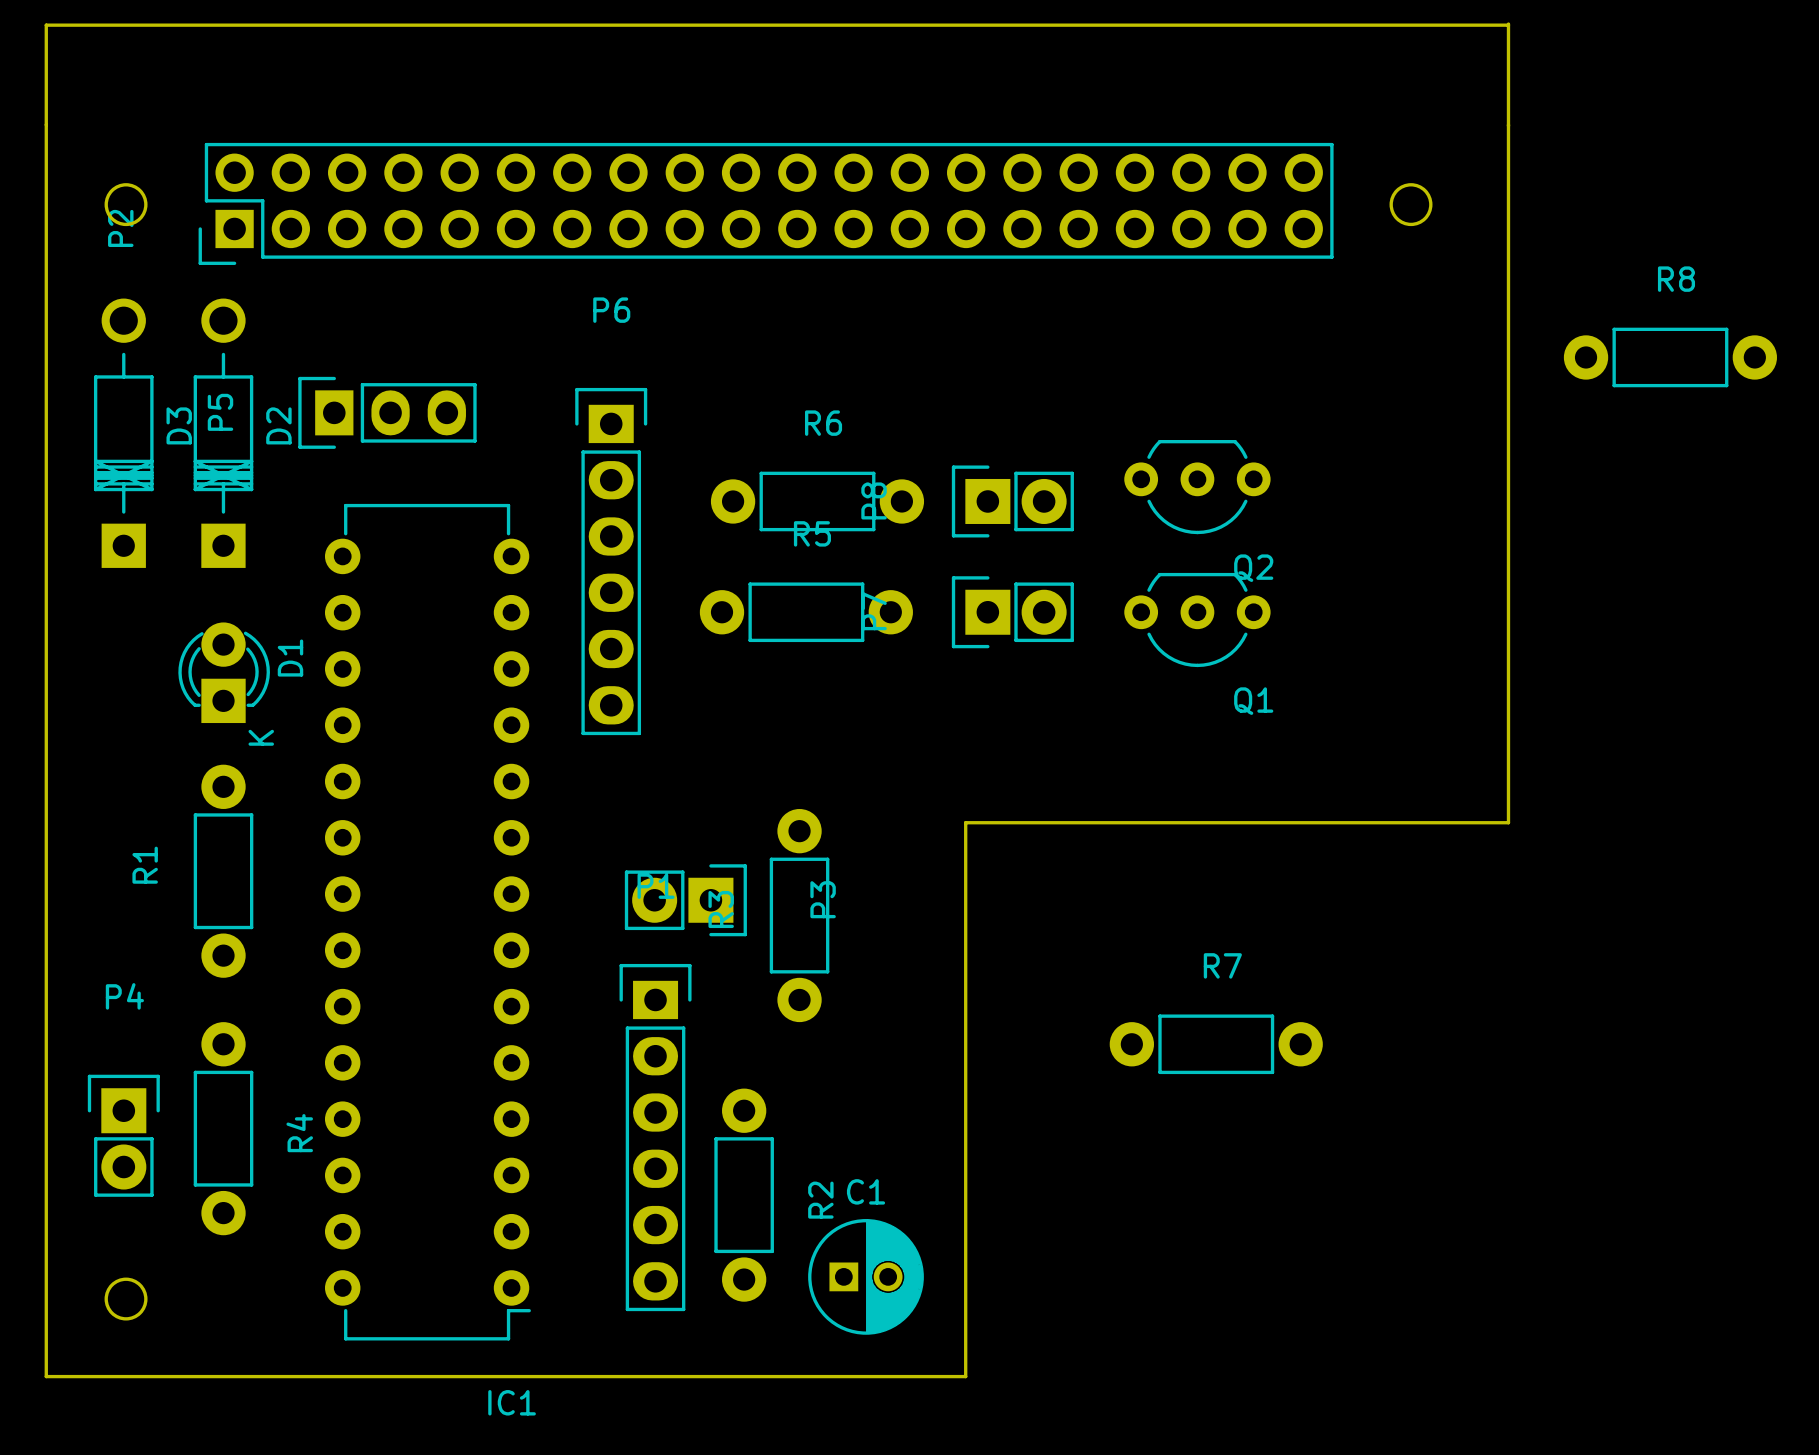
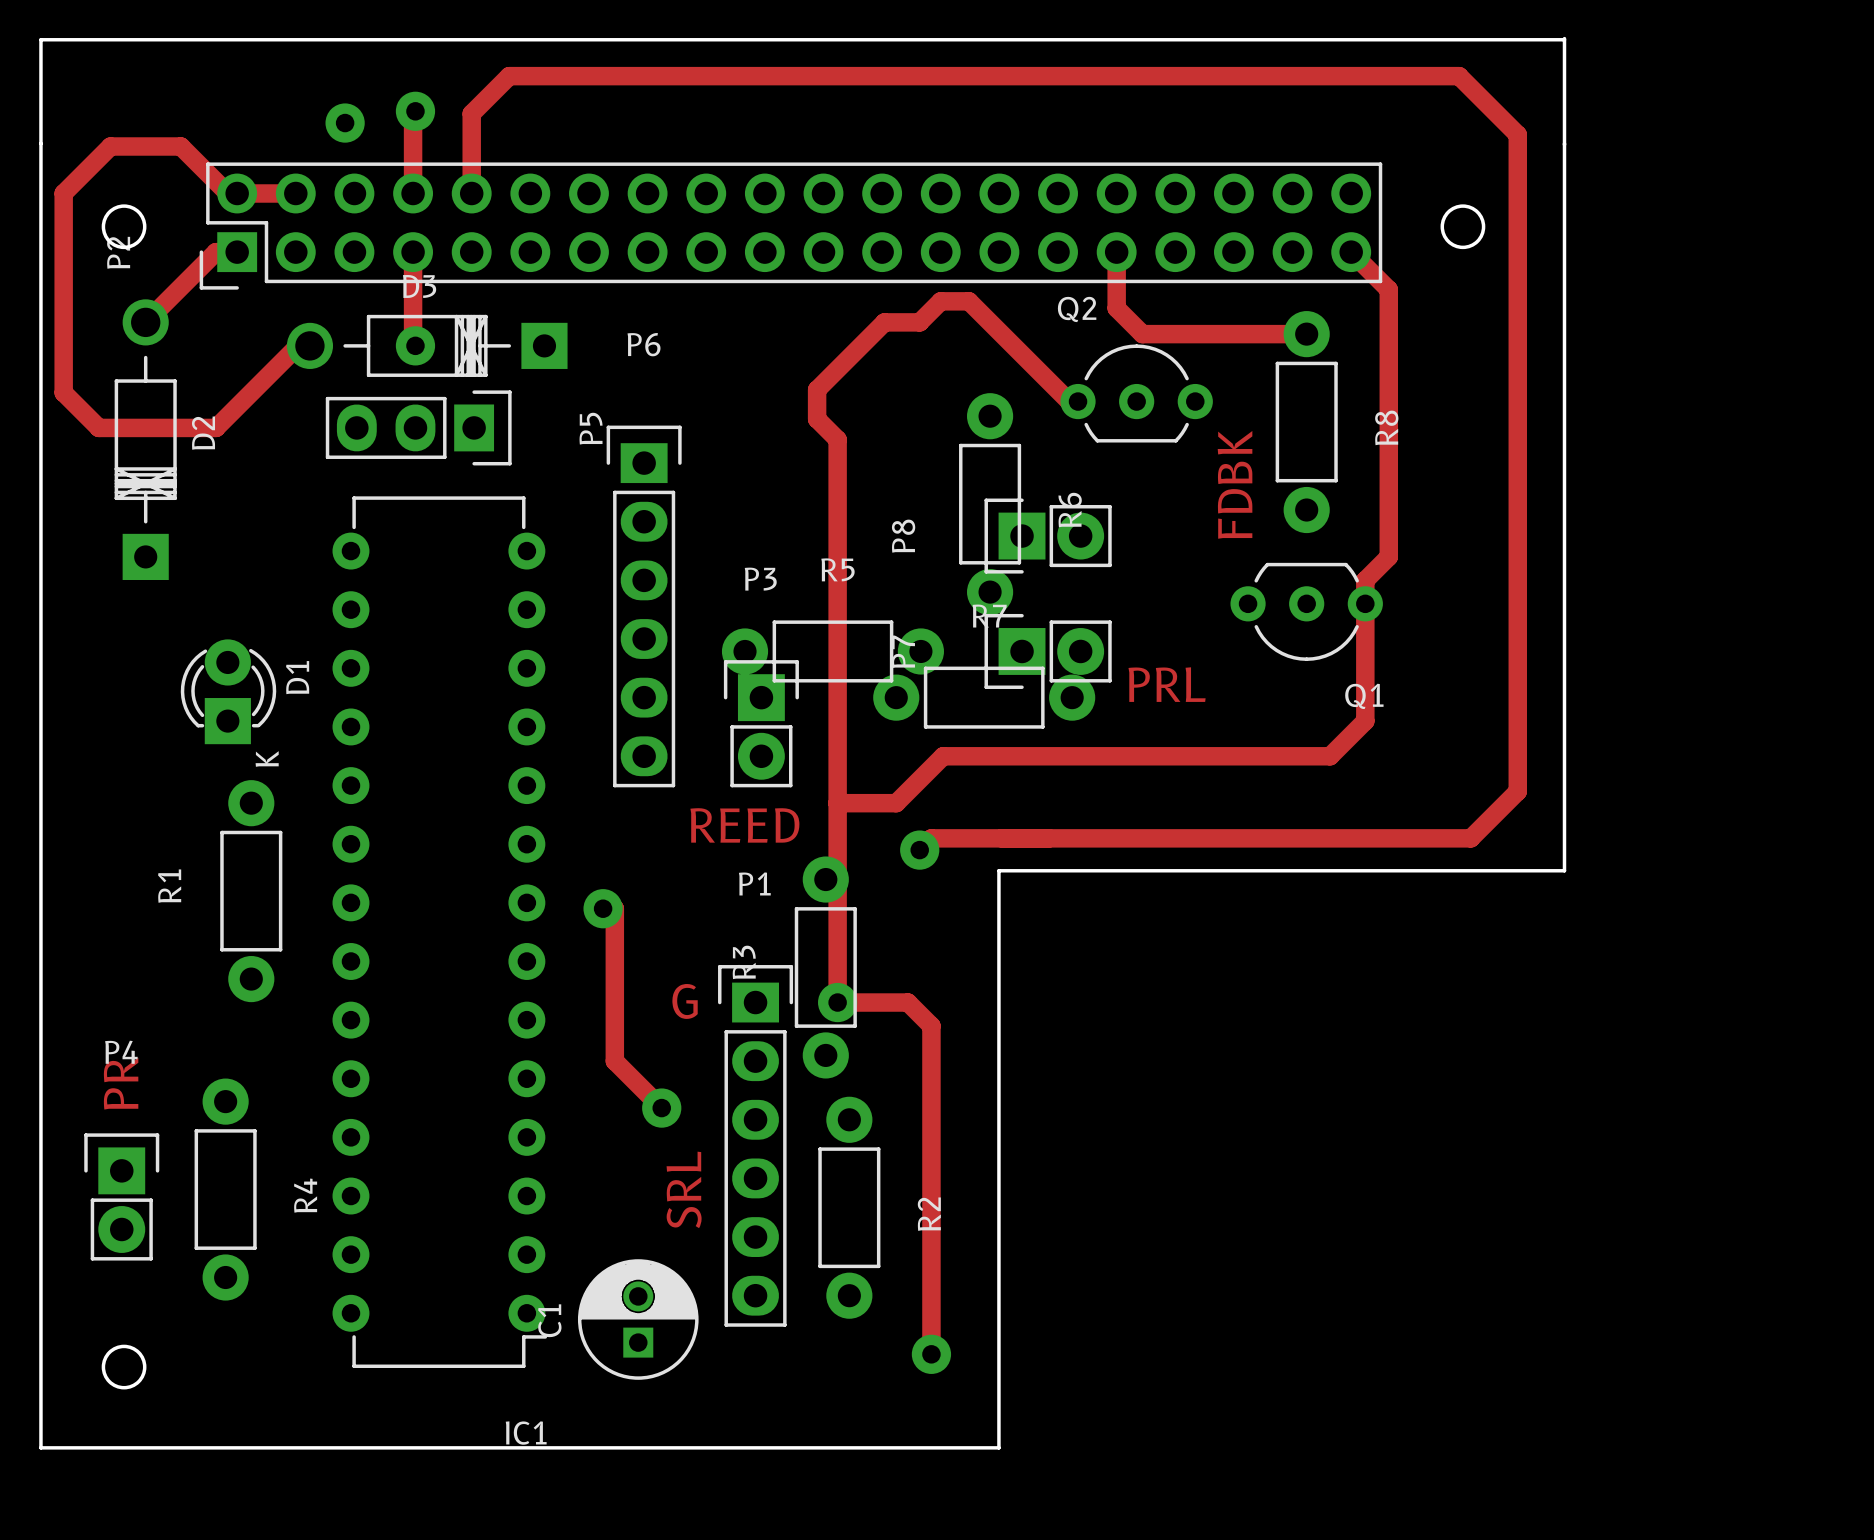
track: none -> (415, 111) (413, 113) (413, 193)
via: none -> (415, 111)
via: none -> (345, 123)
track: none -> (295, 193) (227, 193) (180, 146) (110, 146) (63, 193) (63, 392) (98, 427) (216, 427) (298, 345) (309, 345)
track: none -> (471, 193) (471, 113) (509, 76) (1459, 76) (1517, 134) (1517, 791) (1470, 838) (931, 838) (919, 850)
track: none -> (237, 252) (215, 252) (145, 322)
track: none -> (413, 252) (413, 343) (415, 345)
track: none -> (1116, 252) (1116, 308) (1142, 334) (1306, 334)
track: none -> (1351, 252) (1388, 289) (1388, 556) (1365, 580) (1365, 721) (1330, 756) (943, 756) (896, 803) (837, 803)
via: none -> (415, 345)
R8 rotation: 0° (1670, 357) -> 90° clockwise (1306, 422)
R8 position: (1670, 357) -> (1306, 422)
track: none -> (1078, 401) (1069, 401) (969, 301) (940, 301) (919, 322) (884, 322) (817, 389) (817, 419) (837, 439) (837, 1002) (907, 1002) (931, 1025) (931, 1354)
P5 rotation: 0° (387, 412) -> 180° (418, 427)
D3 rotation: 0° (123, 433) -> 90° counterclockwise (427, 345)
D3 position: (123, 433) -> (427, 345)
D2 position: (223, 433) -> (145, 439)
text: none -> FDBK (1235, 484)
Q2 rotation: 0° (1197, 487) -> 180° (1136, 393)
Q2 position: (1197, 487) -> (1136, 393)
R6 rotation: 0° (817, 501) -> 90° clockwise (990, 504)
R6 position: (817, 501) -> (990, 504)
P6 position: (611, 561) -> (644, 606)
Q1 position: (1197, 620) -> (1306, 611)
text: none -> PRL (1167, 684)
D1 position: (224, 672) -> (228, 691)
text: none -> REED (744, 825)
via: none -> (919, 850)
track: none -> (603, 908) (614, 908) (614, 1061) (661, 1108)
via: none -> (603, 908)
R1 position: (223, 871) -> (251, 891)
P3 rotation: 0° (685, 900) -> 90° counterclockwise (761, 723)
P3 position: (685, 900) -> (761, 723)
IC1 position: (427, 922) -> (439, 932)
text: none -> G (685, 1001)
via: none -> (837, 1002)
text: none -> PR (121, 1083)
R7 position: (1216, 1044) -> (984, 697)
via: none -> (661, 1108)
text: none -> SRL (684, 1189)
P1 position: (655, 1137) -> (755, 1145)
R2 position: (744, 1195) -> (849, 1207)
C1 rotation: 0° (866, 1276) -> 90° counterclockwise (638, 1319)
C1 position: (866, 1276) -> (638, 1319)
via: none -> (931, 1354)

